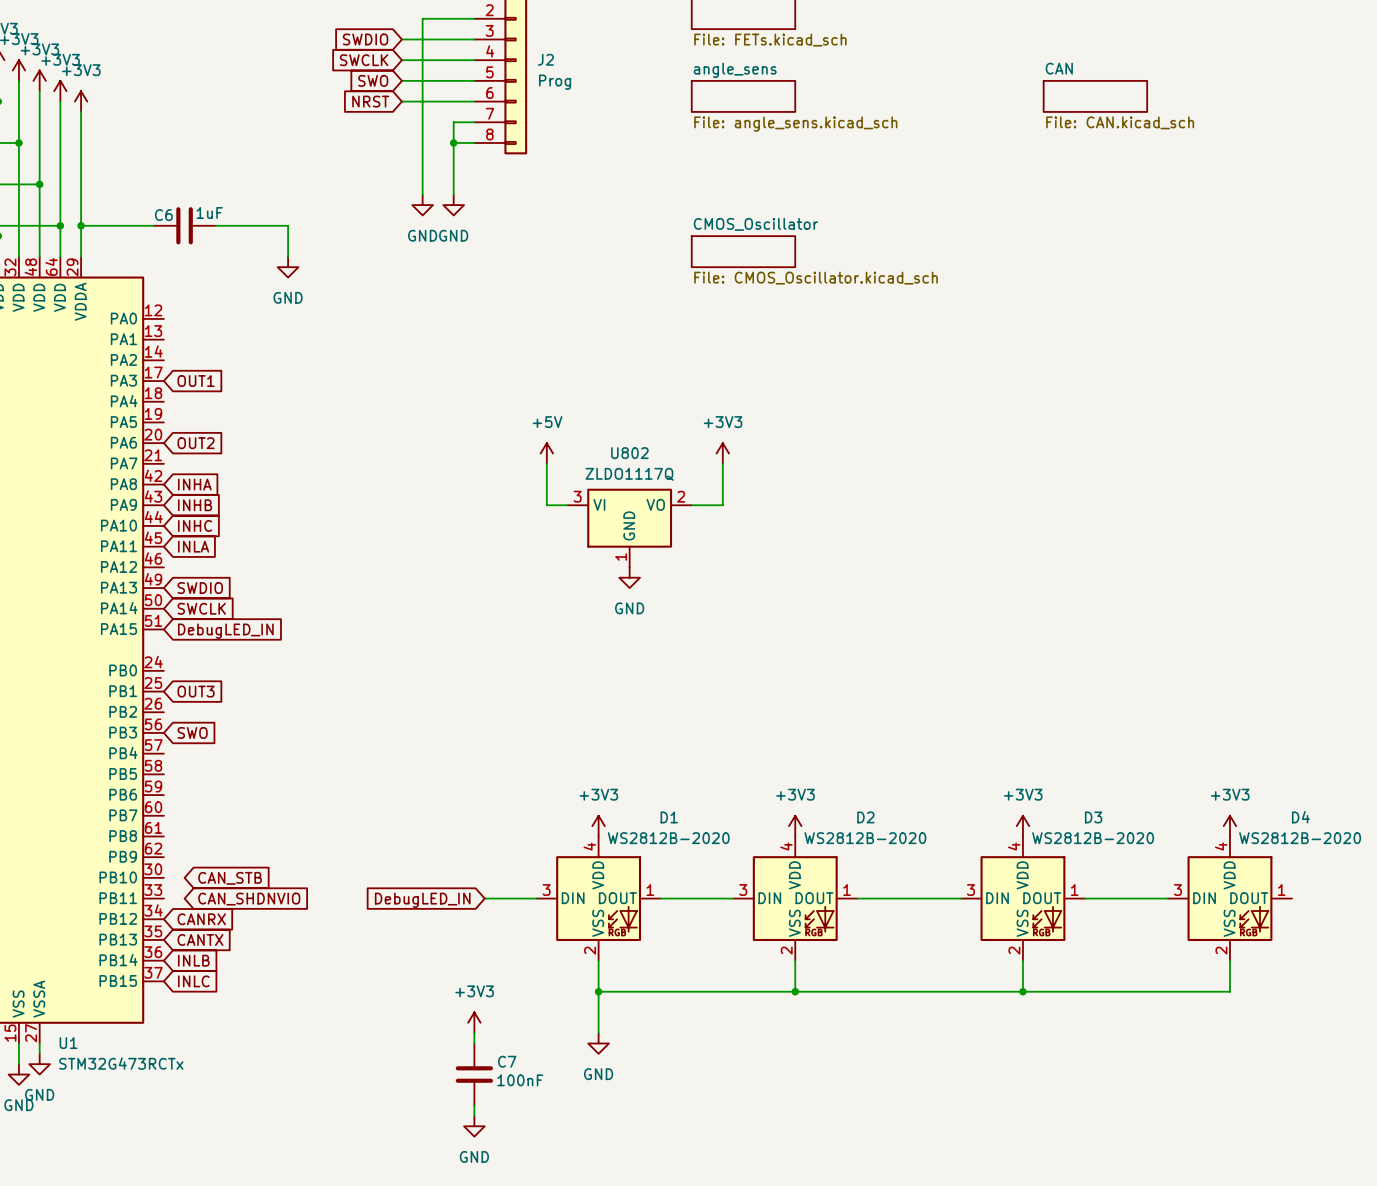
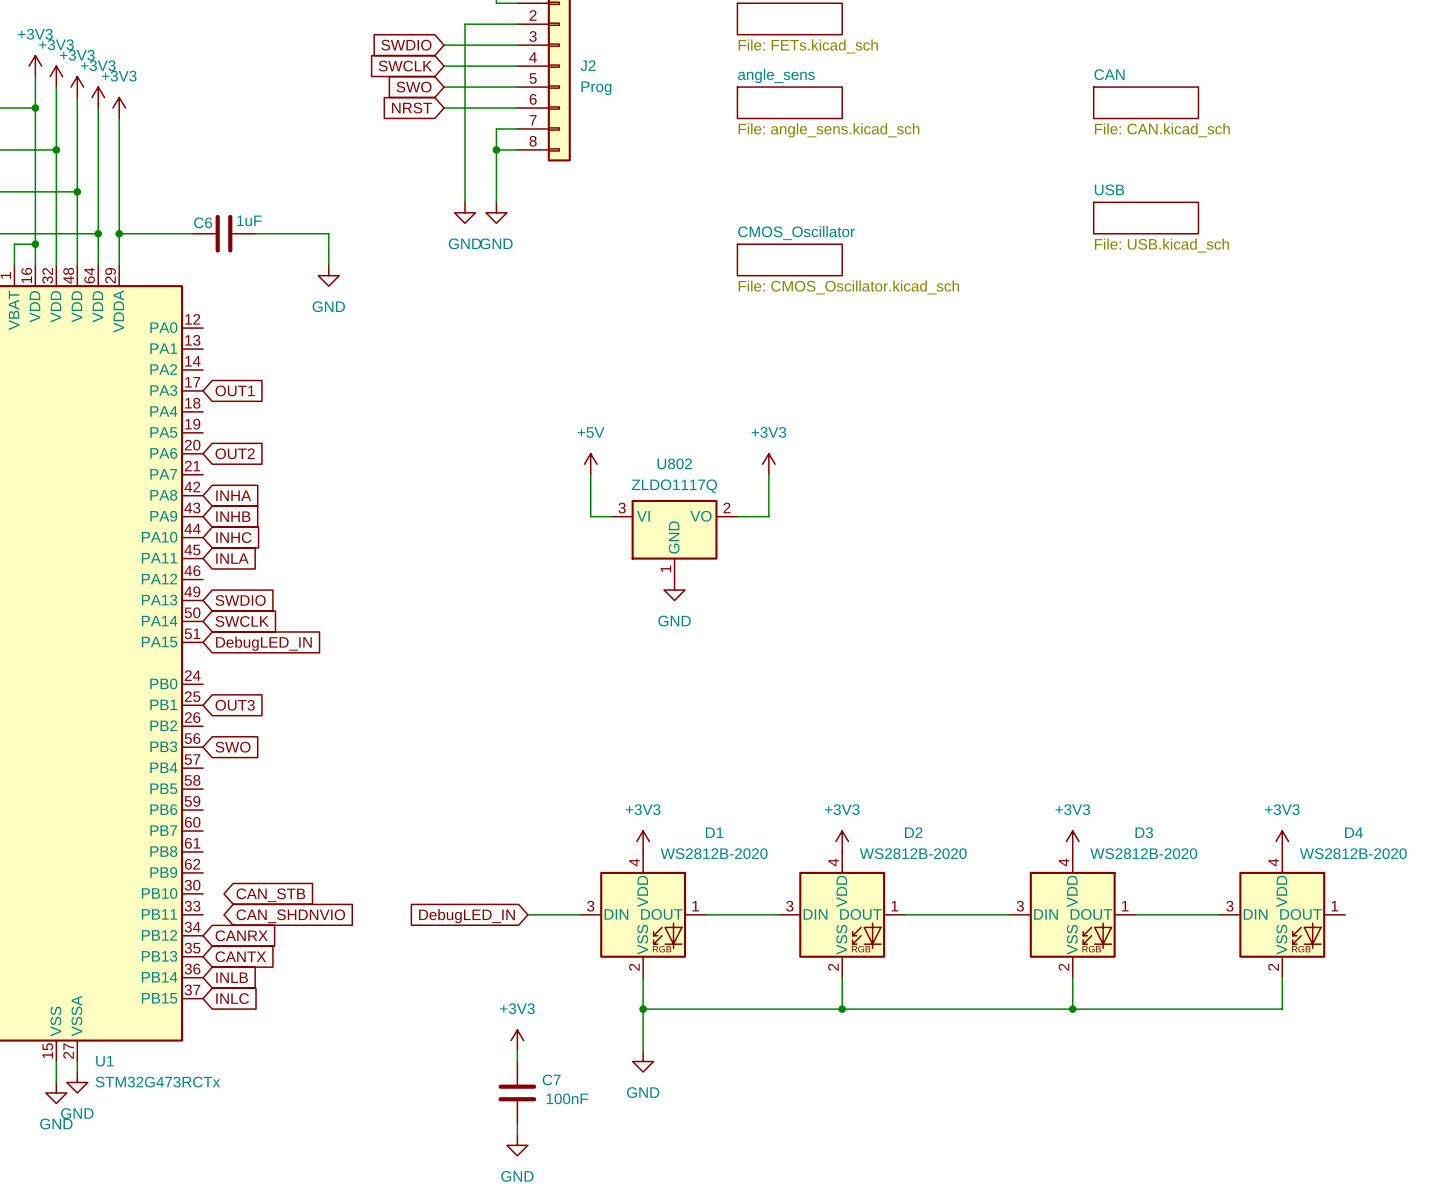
sheet USB: none -> File: USB.kicad_sch (1146, 218)

